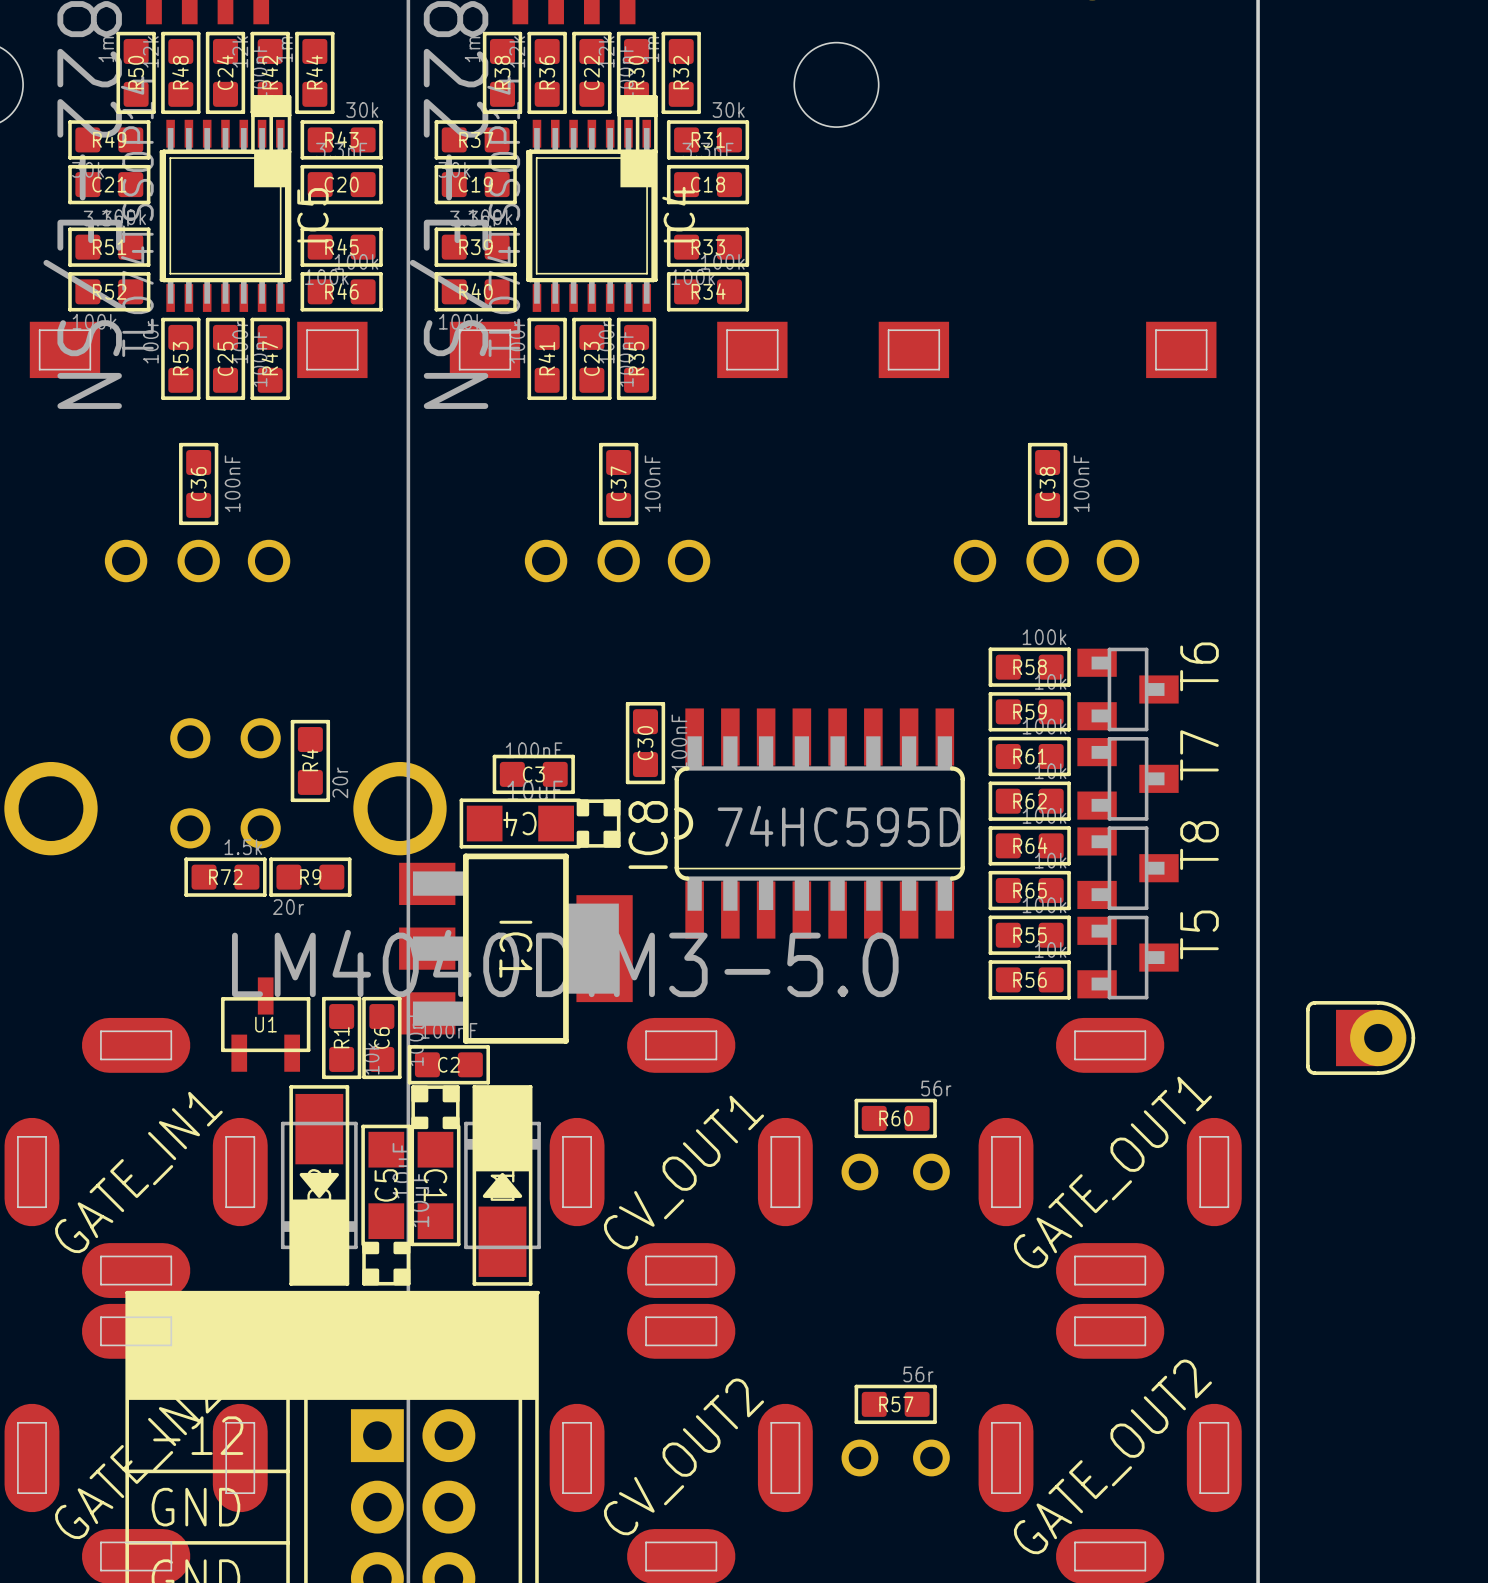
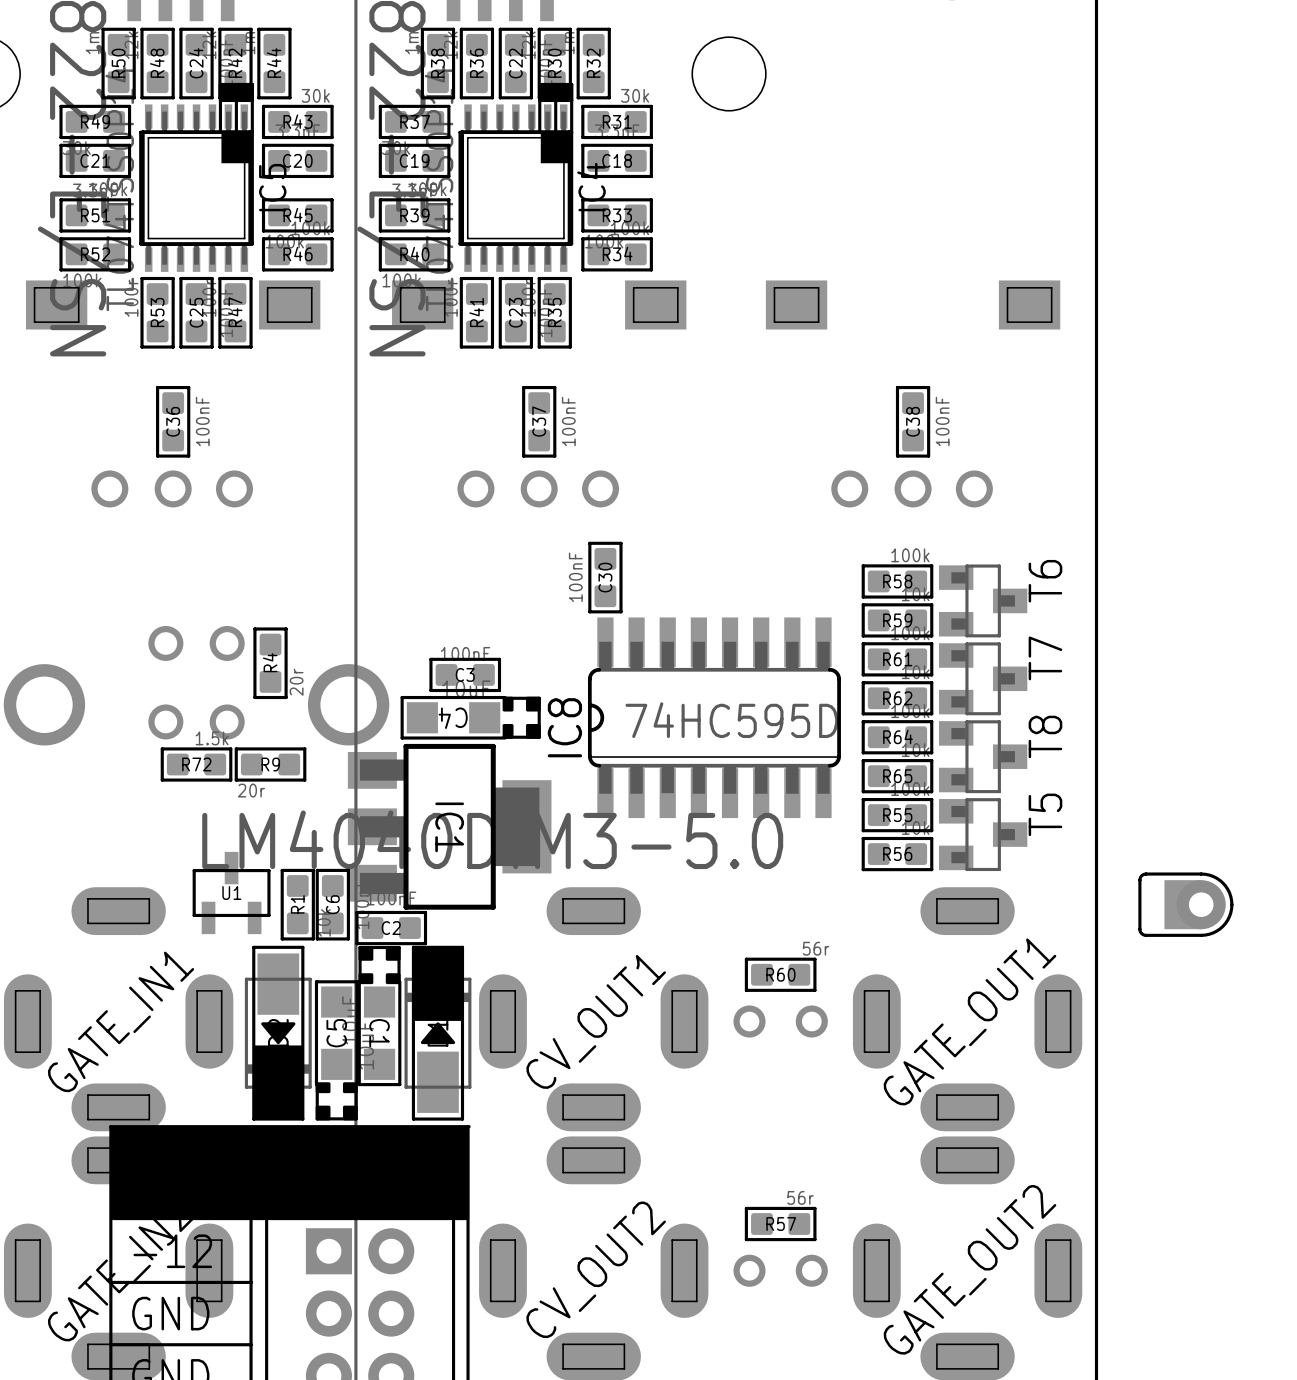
C30 value position: 100nF (679, 742) -> 100nF (575, 577)
C30 position: (645, 743) -> (605, 577)

